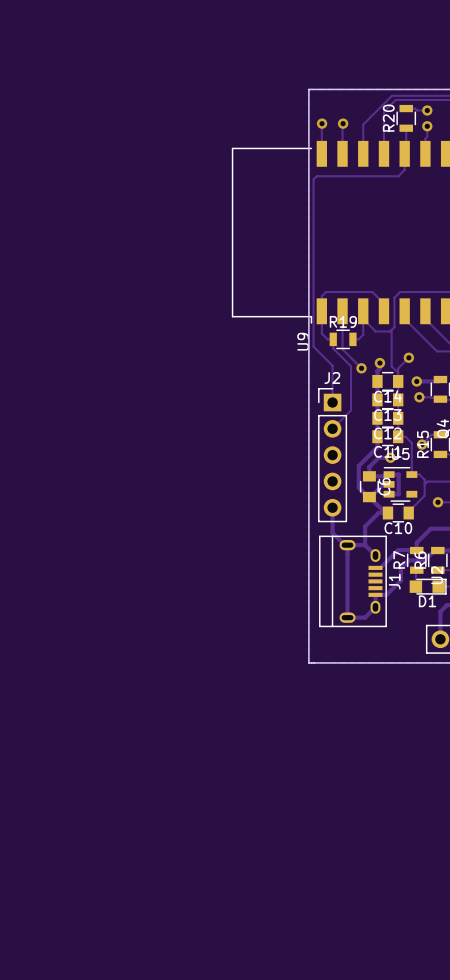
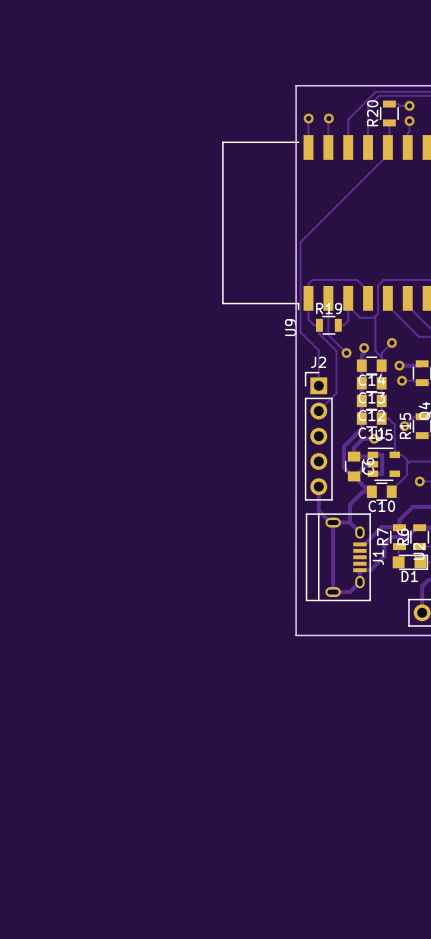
track: (404, 161) (404, 169) (398, 176) (316, 176) (313, 179) (313, 252) -> (387, 154) (300, 242)

